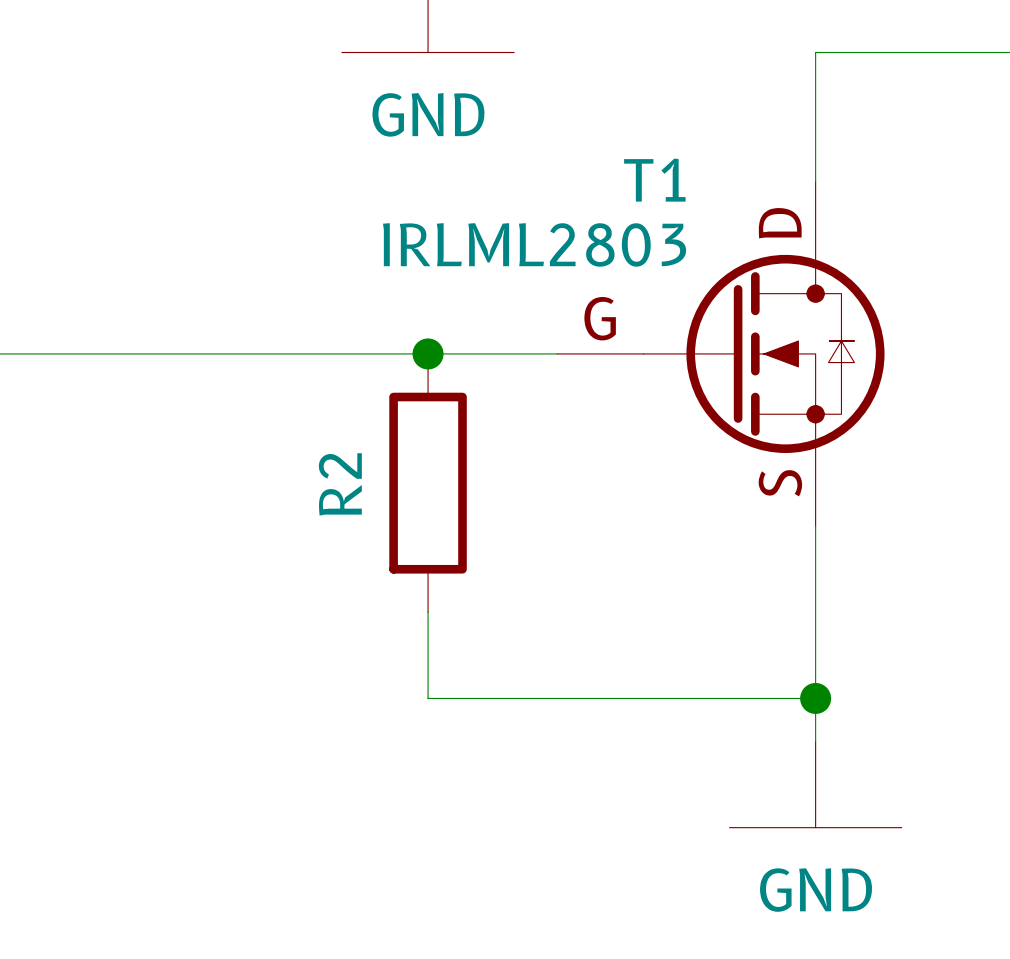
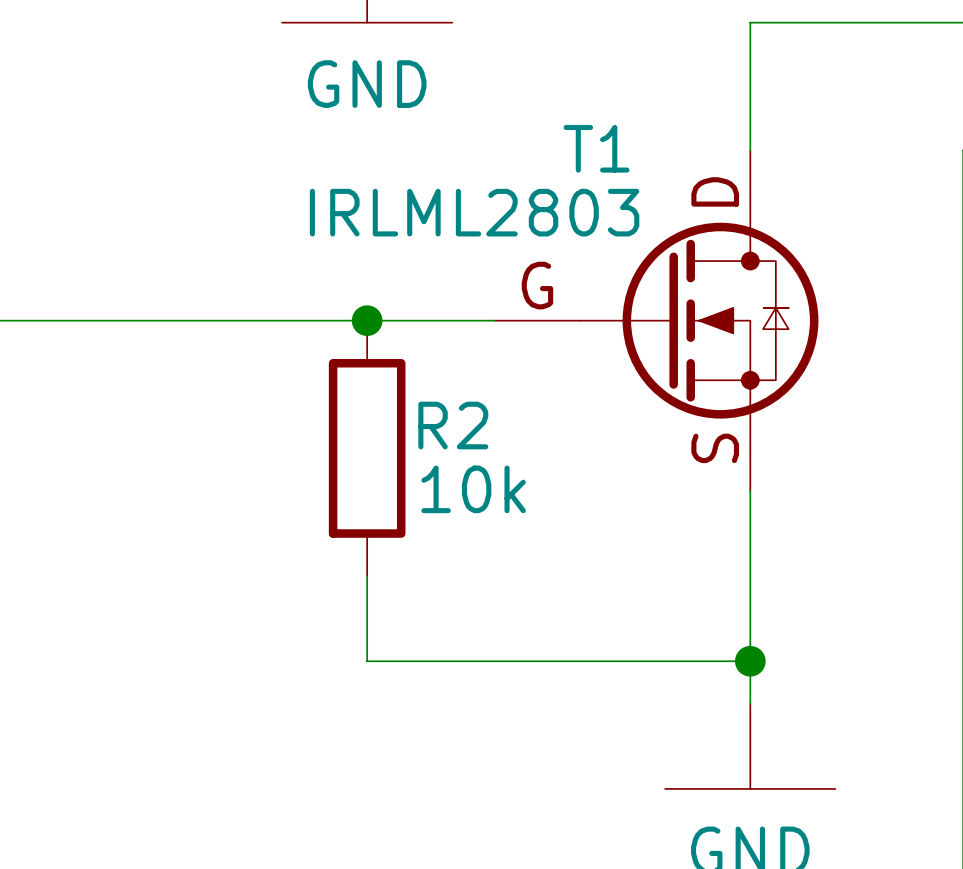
R2 name rotation: 0° (340, 484) -> 90° clockwise (453, 425)
R2 name position: R2 (340, 484) -> R2 (453, 425)
R2 value: none -> 10k (473, 489)

